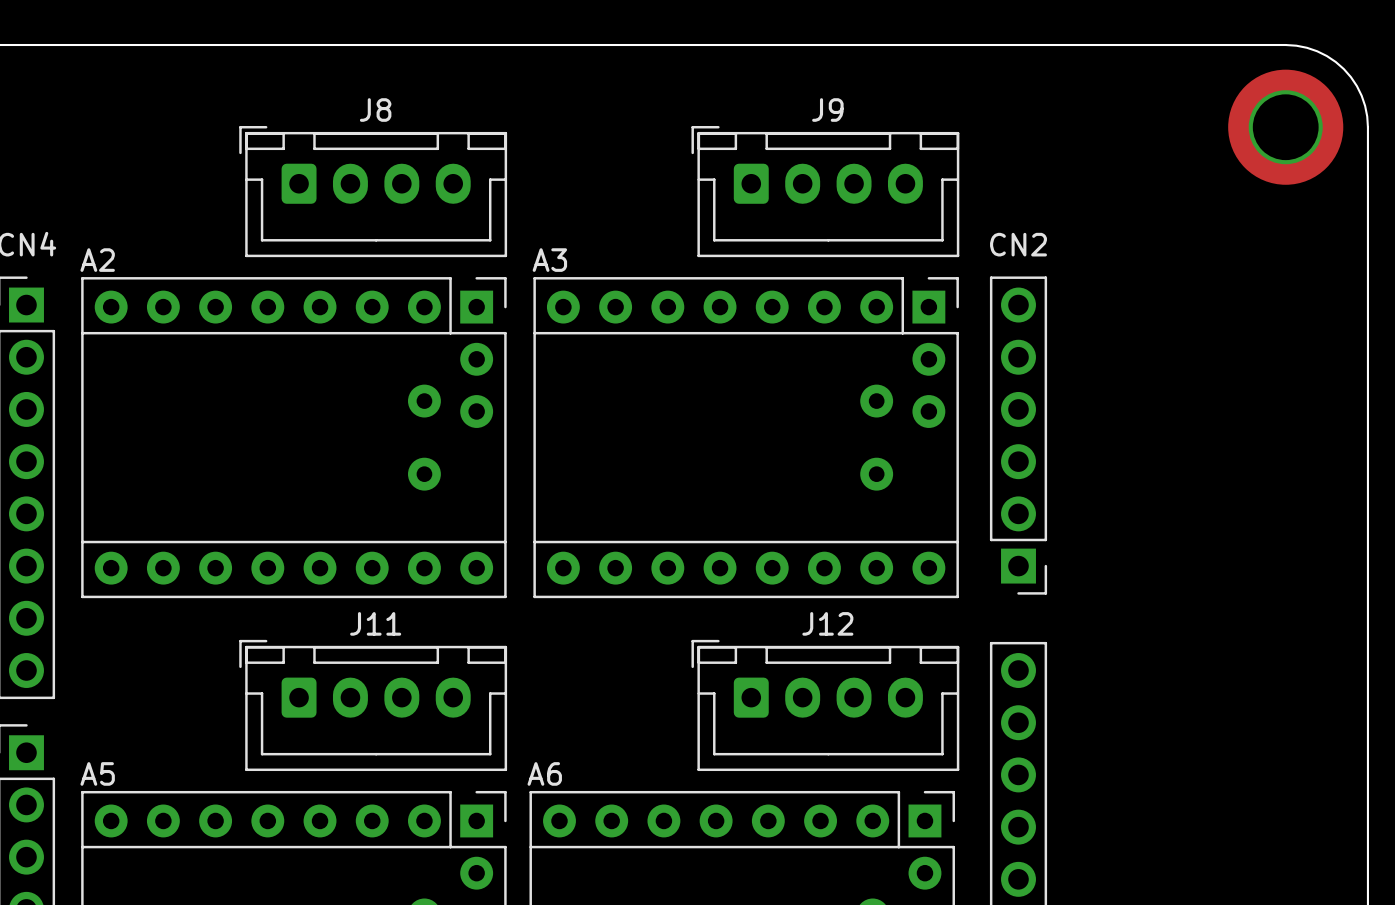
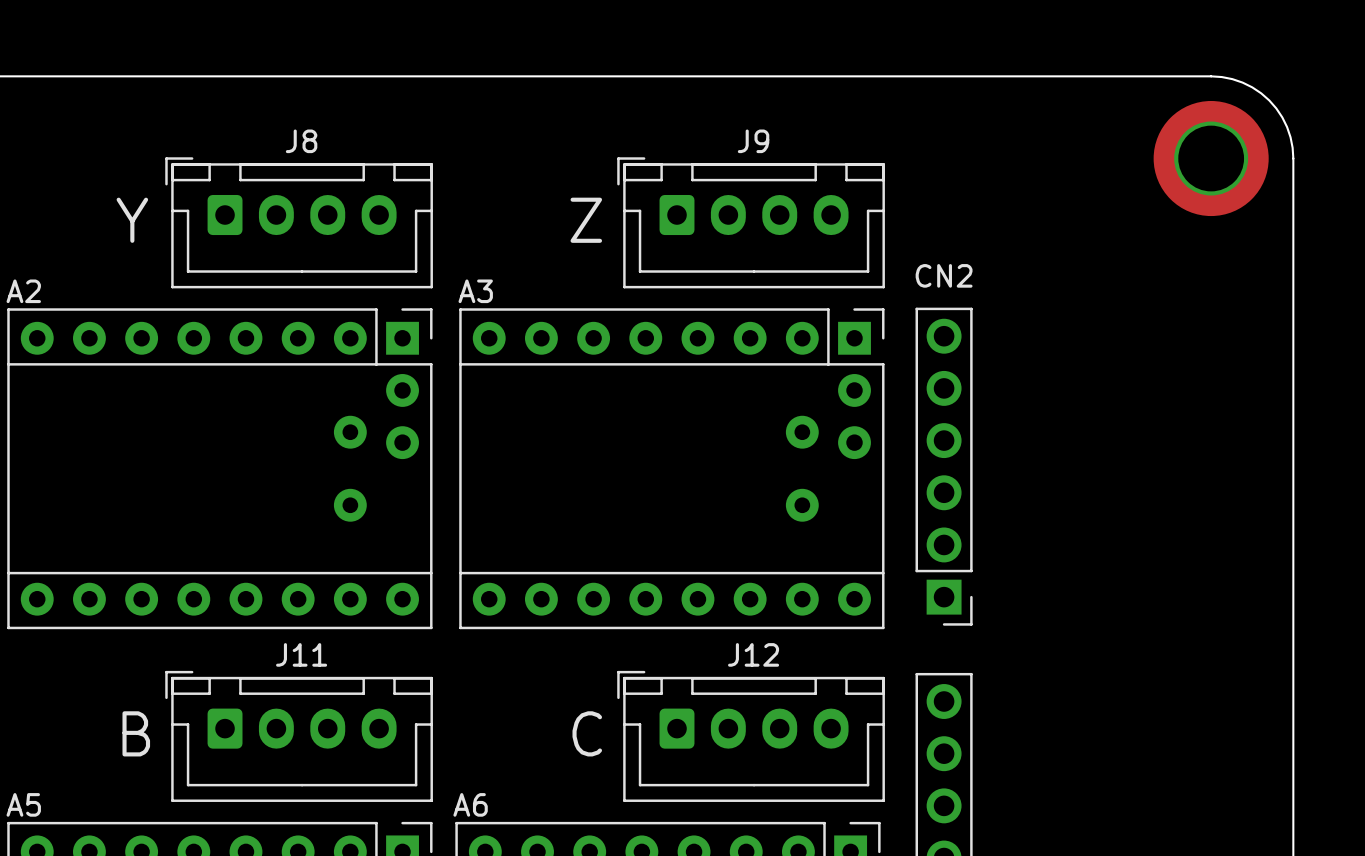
text: none -> Y (132, 220)
text: none -> Z (586, 220)
text: none -> B (136, 733)
text: none -> C (587, 733)

